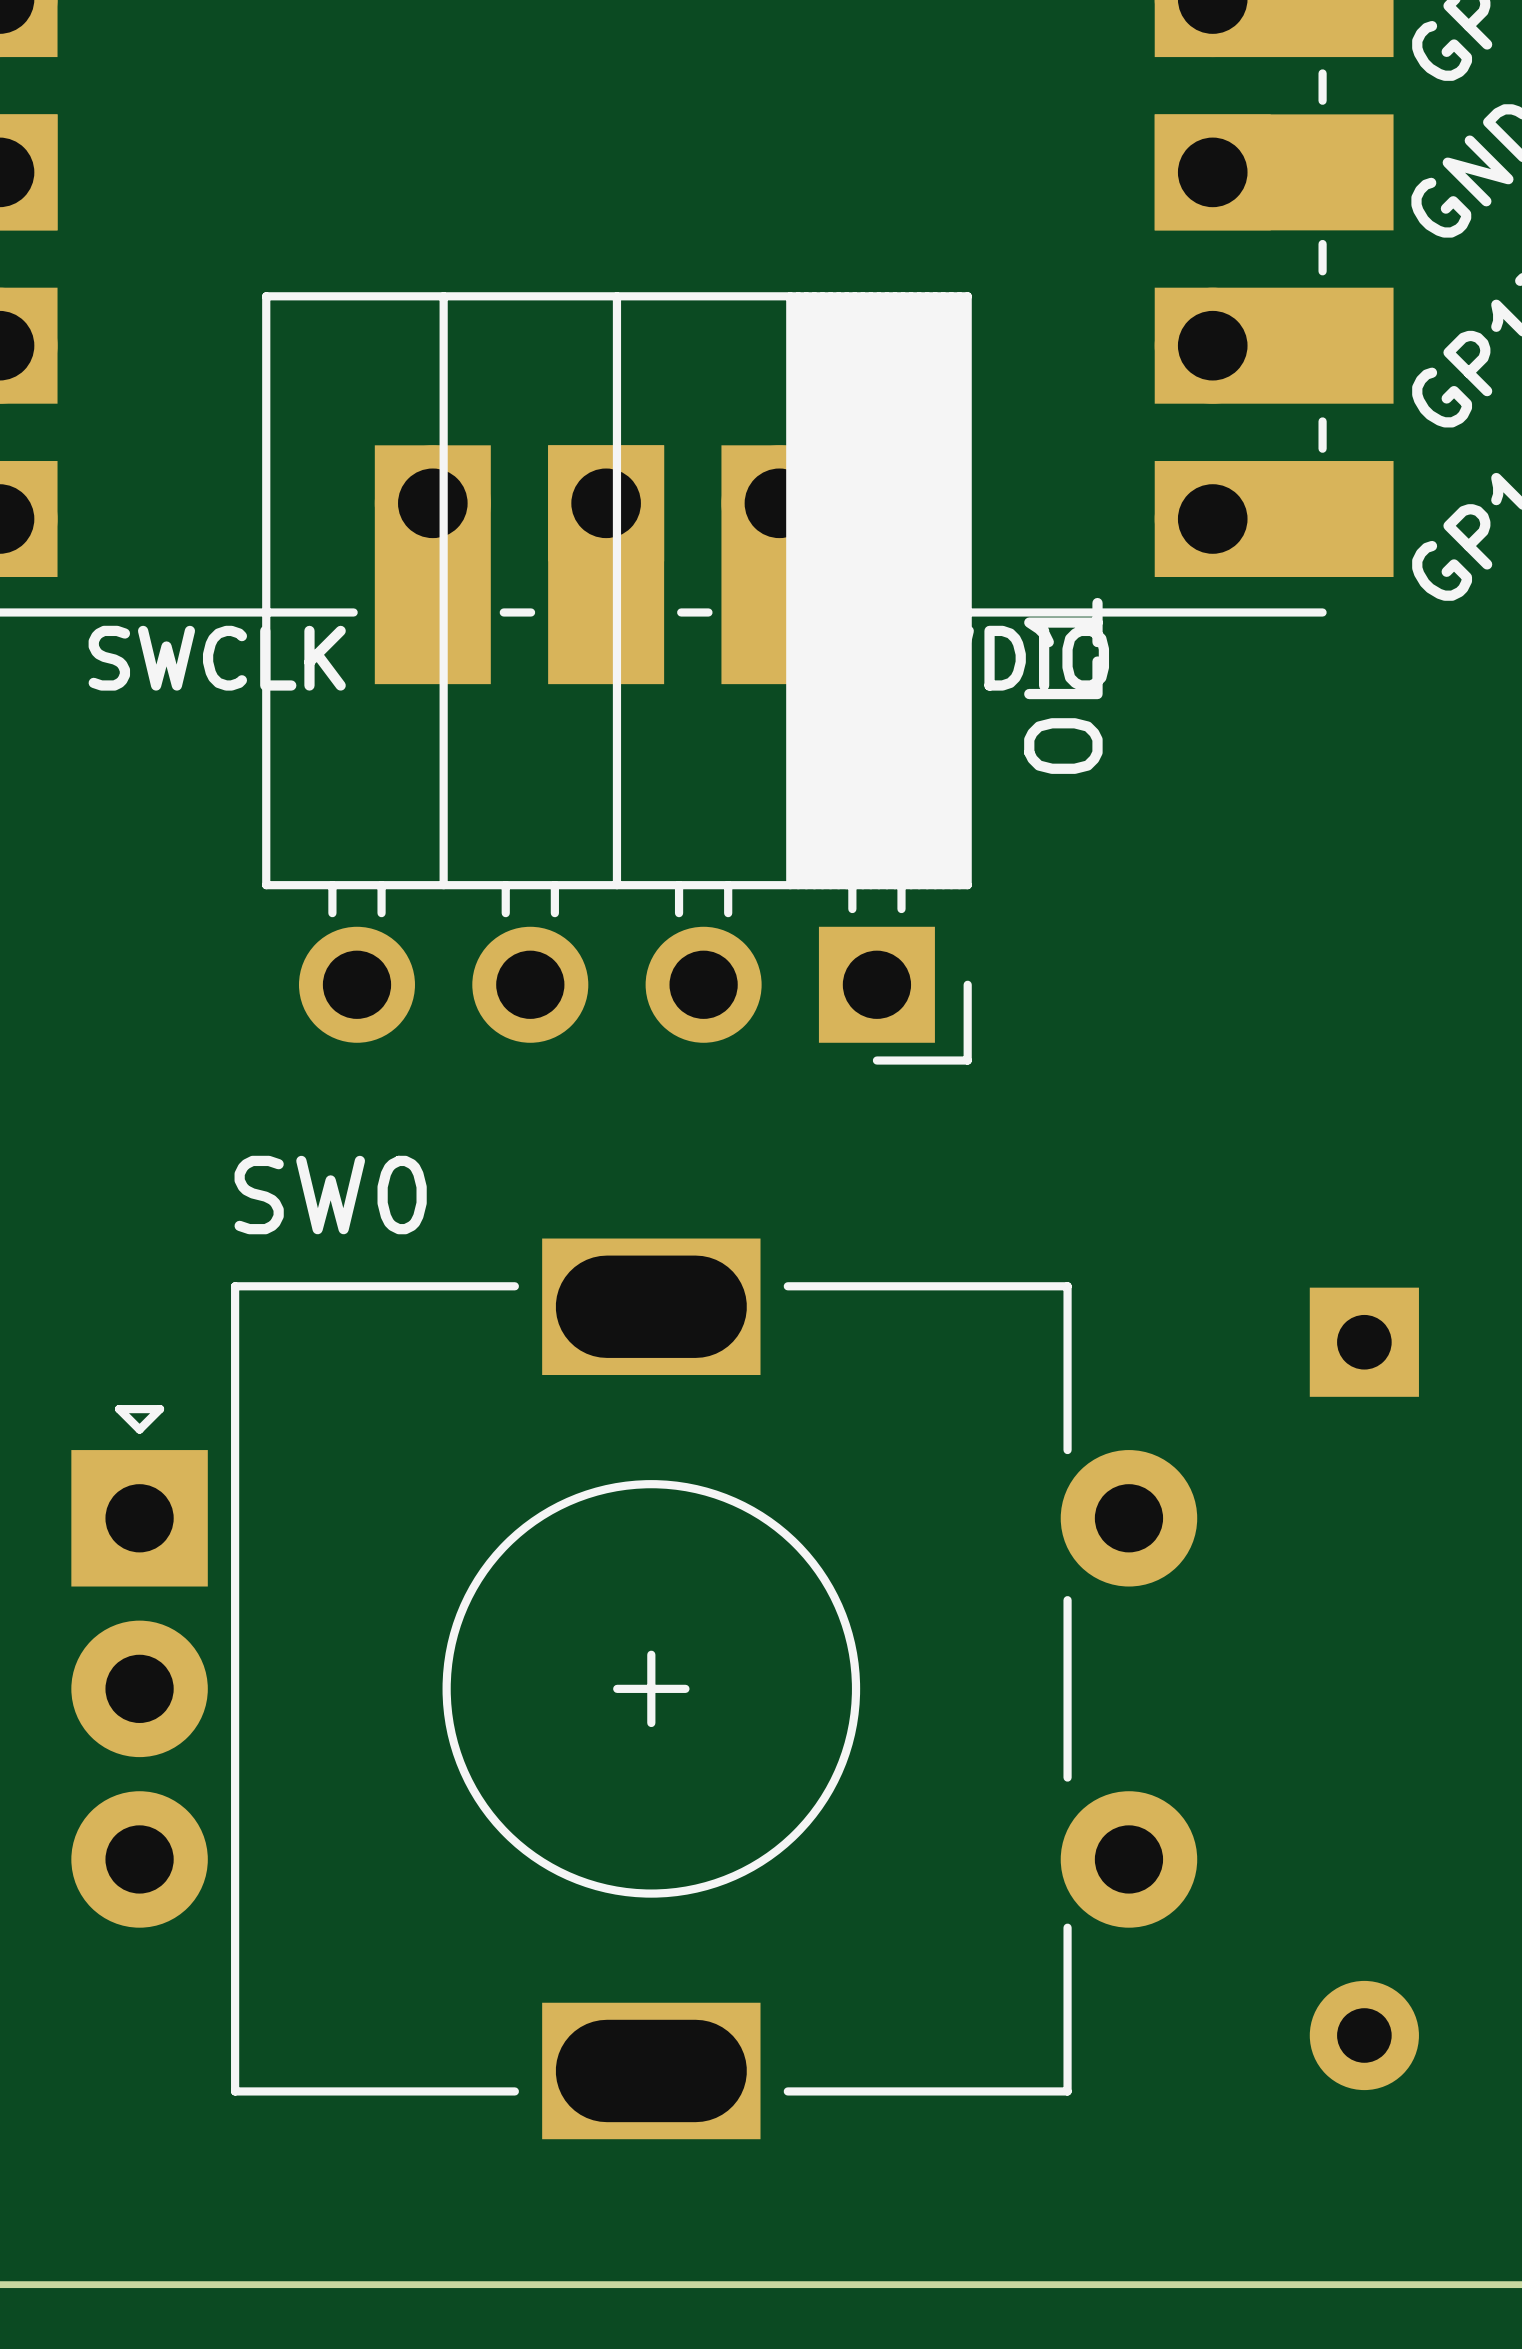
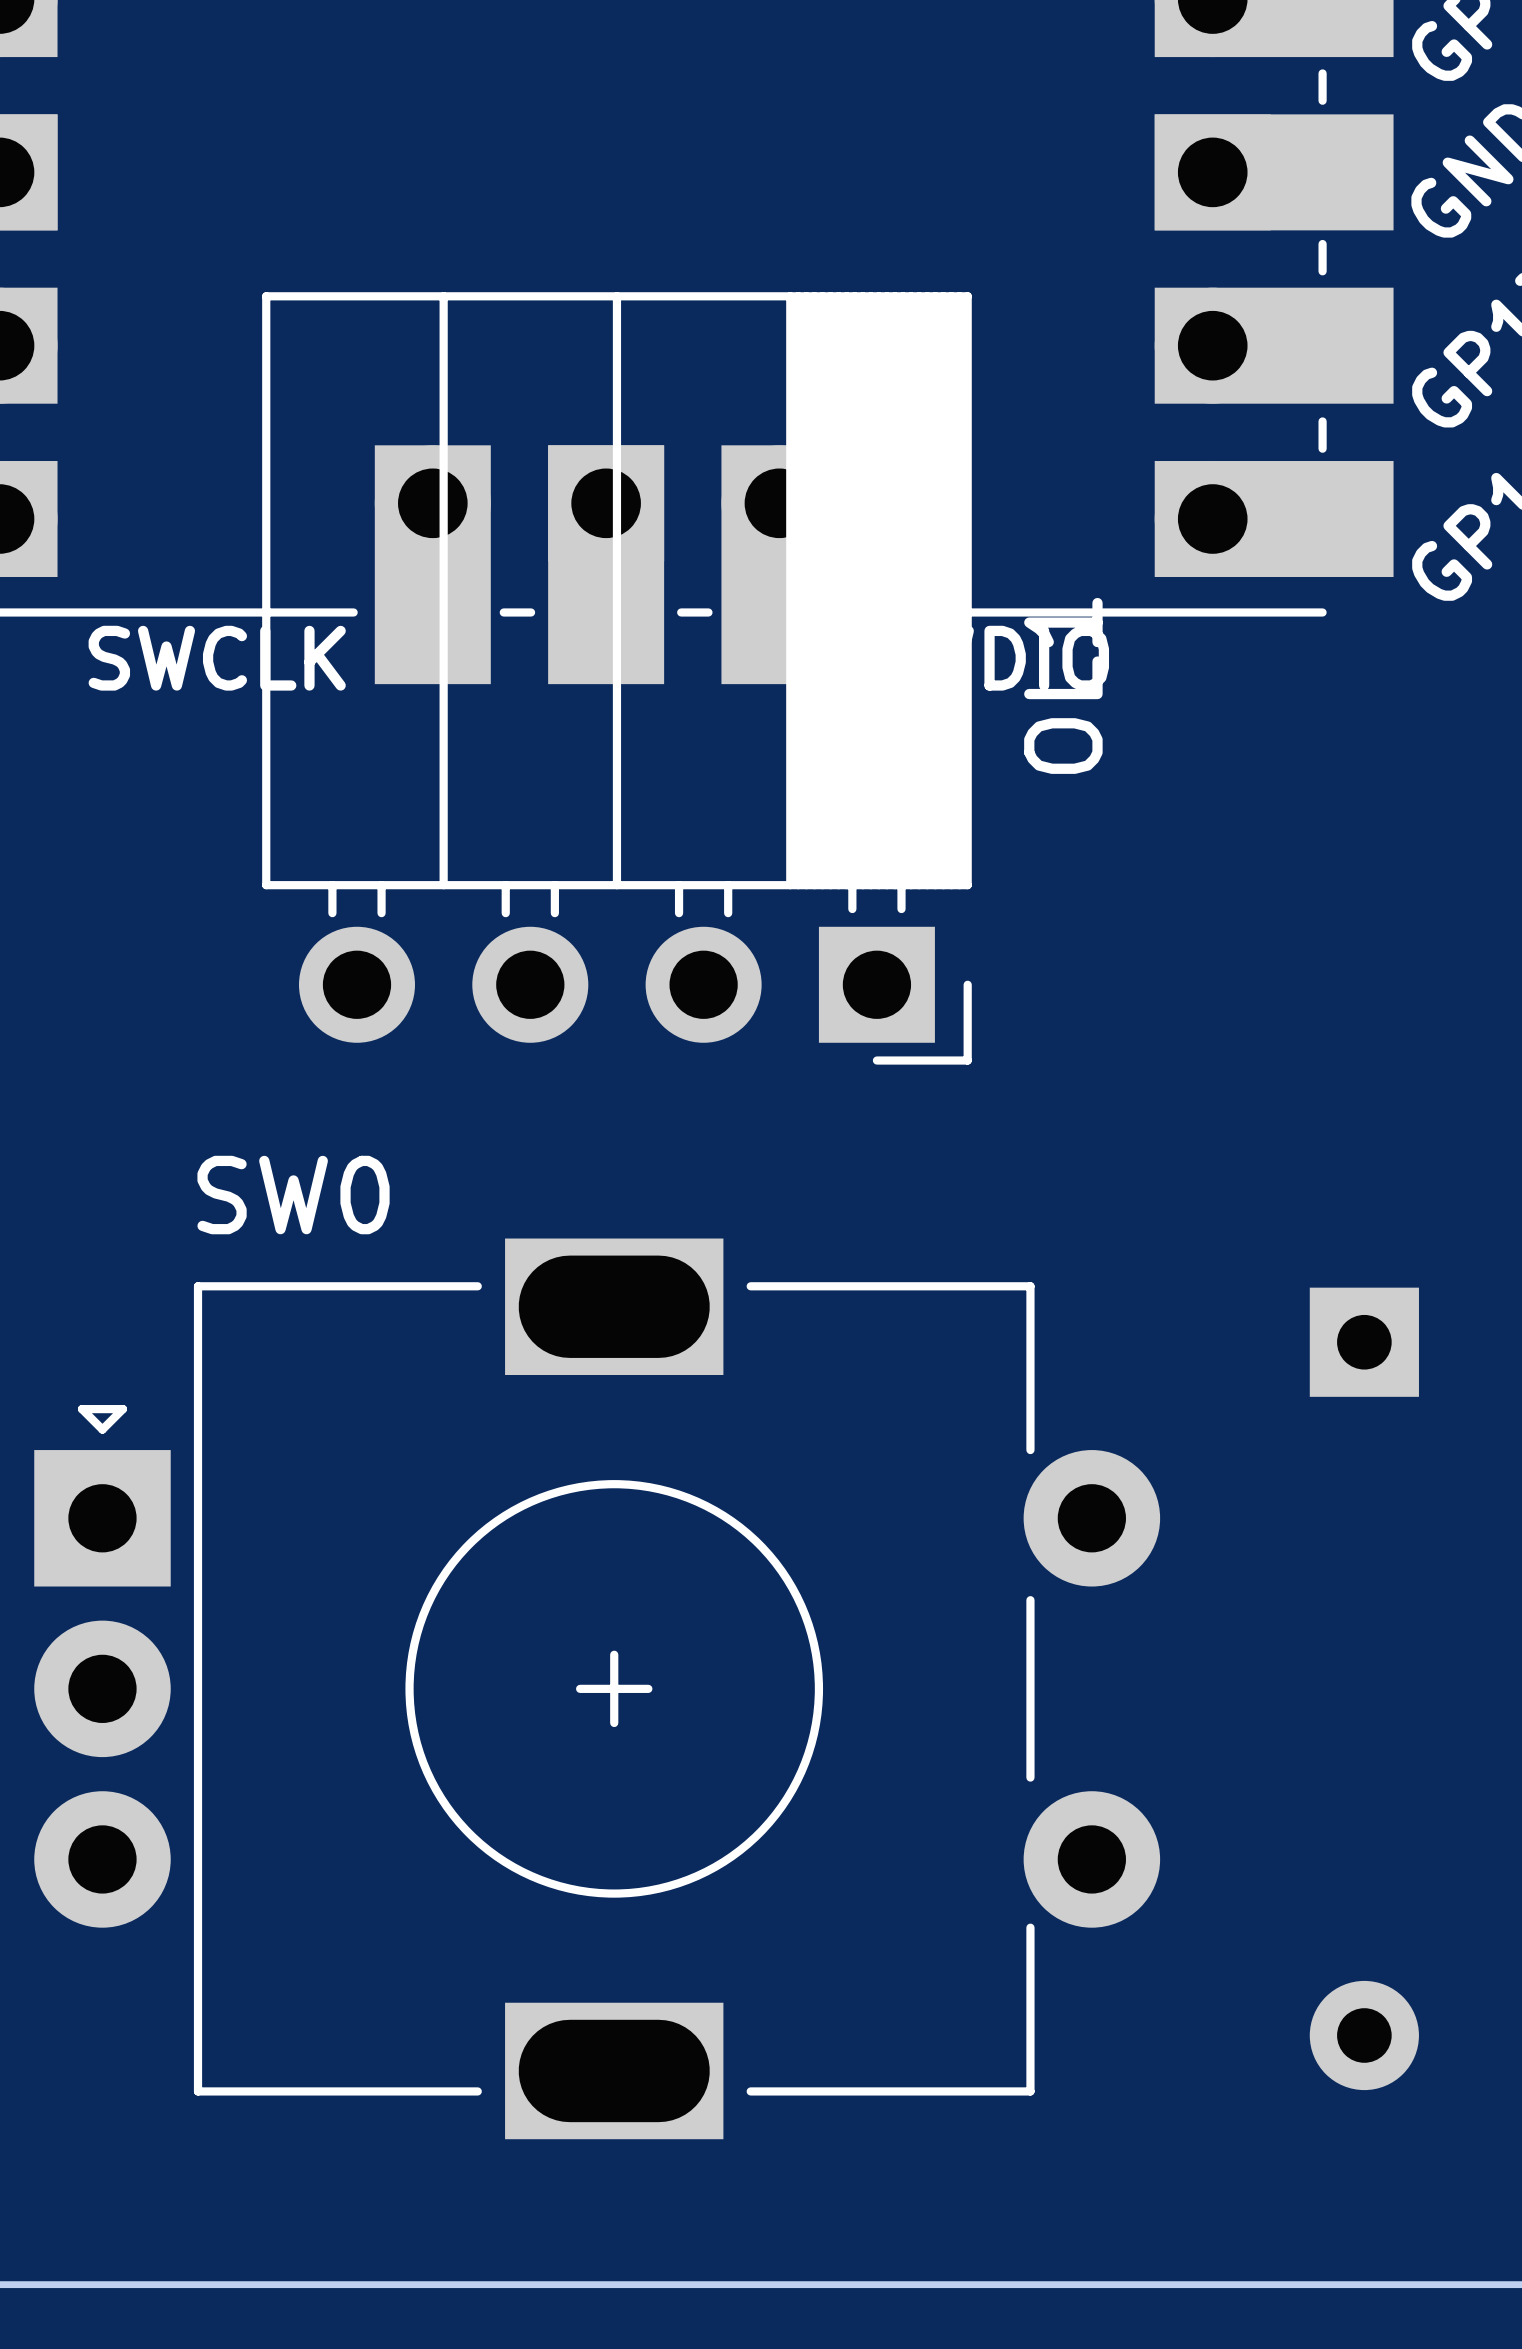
SW0 position: (634, 1688) -> (597, 1688)

